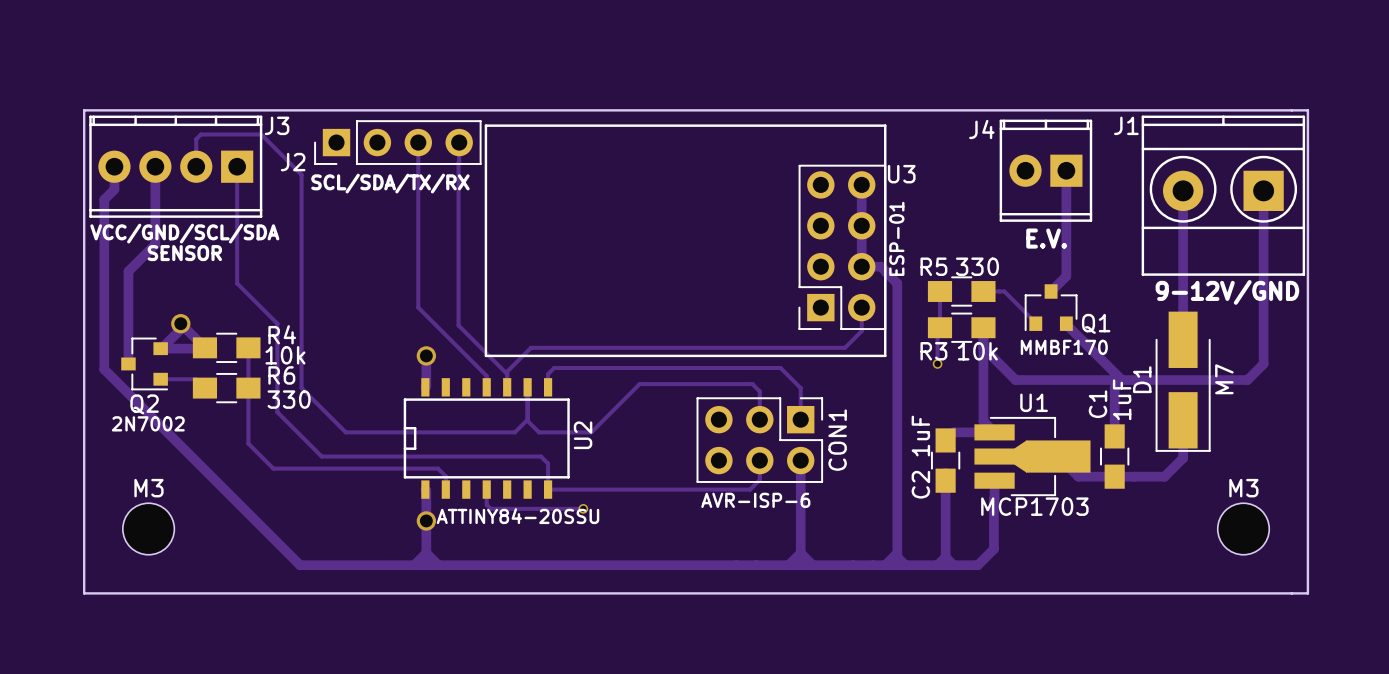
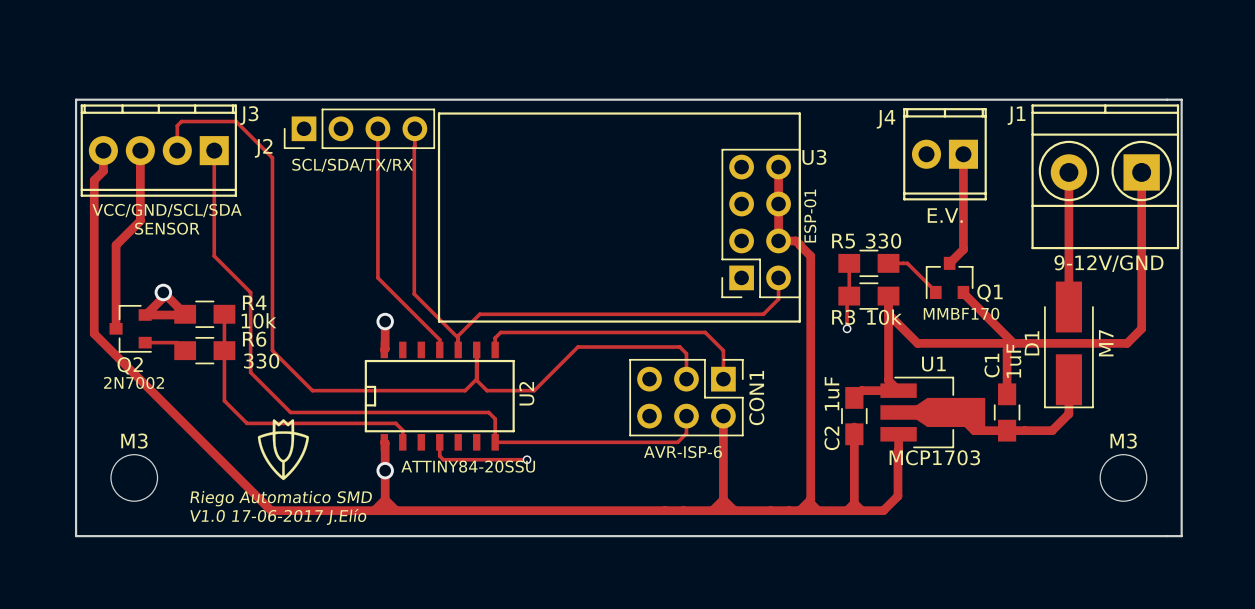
drawing: none -> [257, 419, 309, 481]
text: none -> Riego Automatico SMD (281, 498)
text: none -> V1.0 17-06-2017 J.Elío (278, 517)

